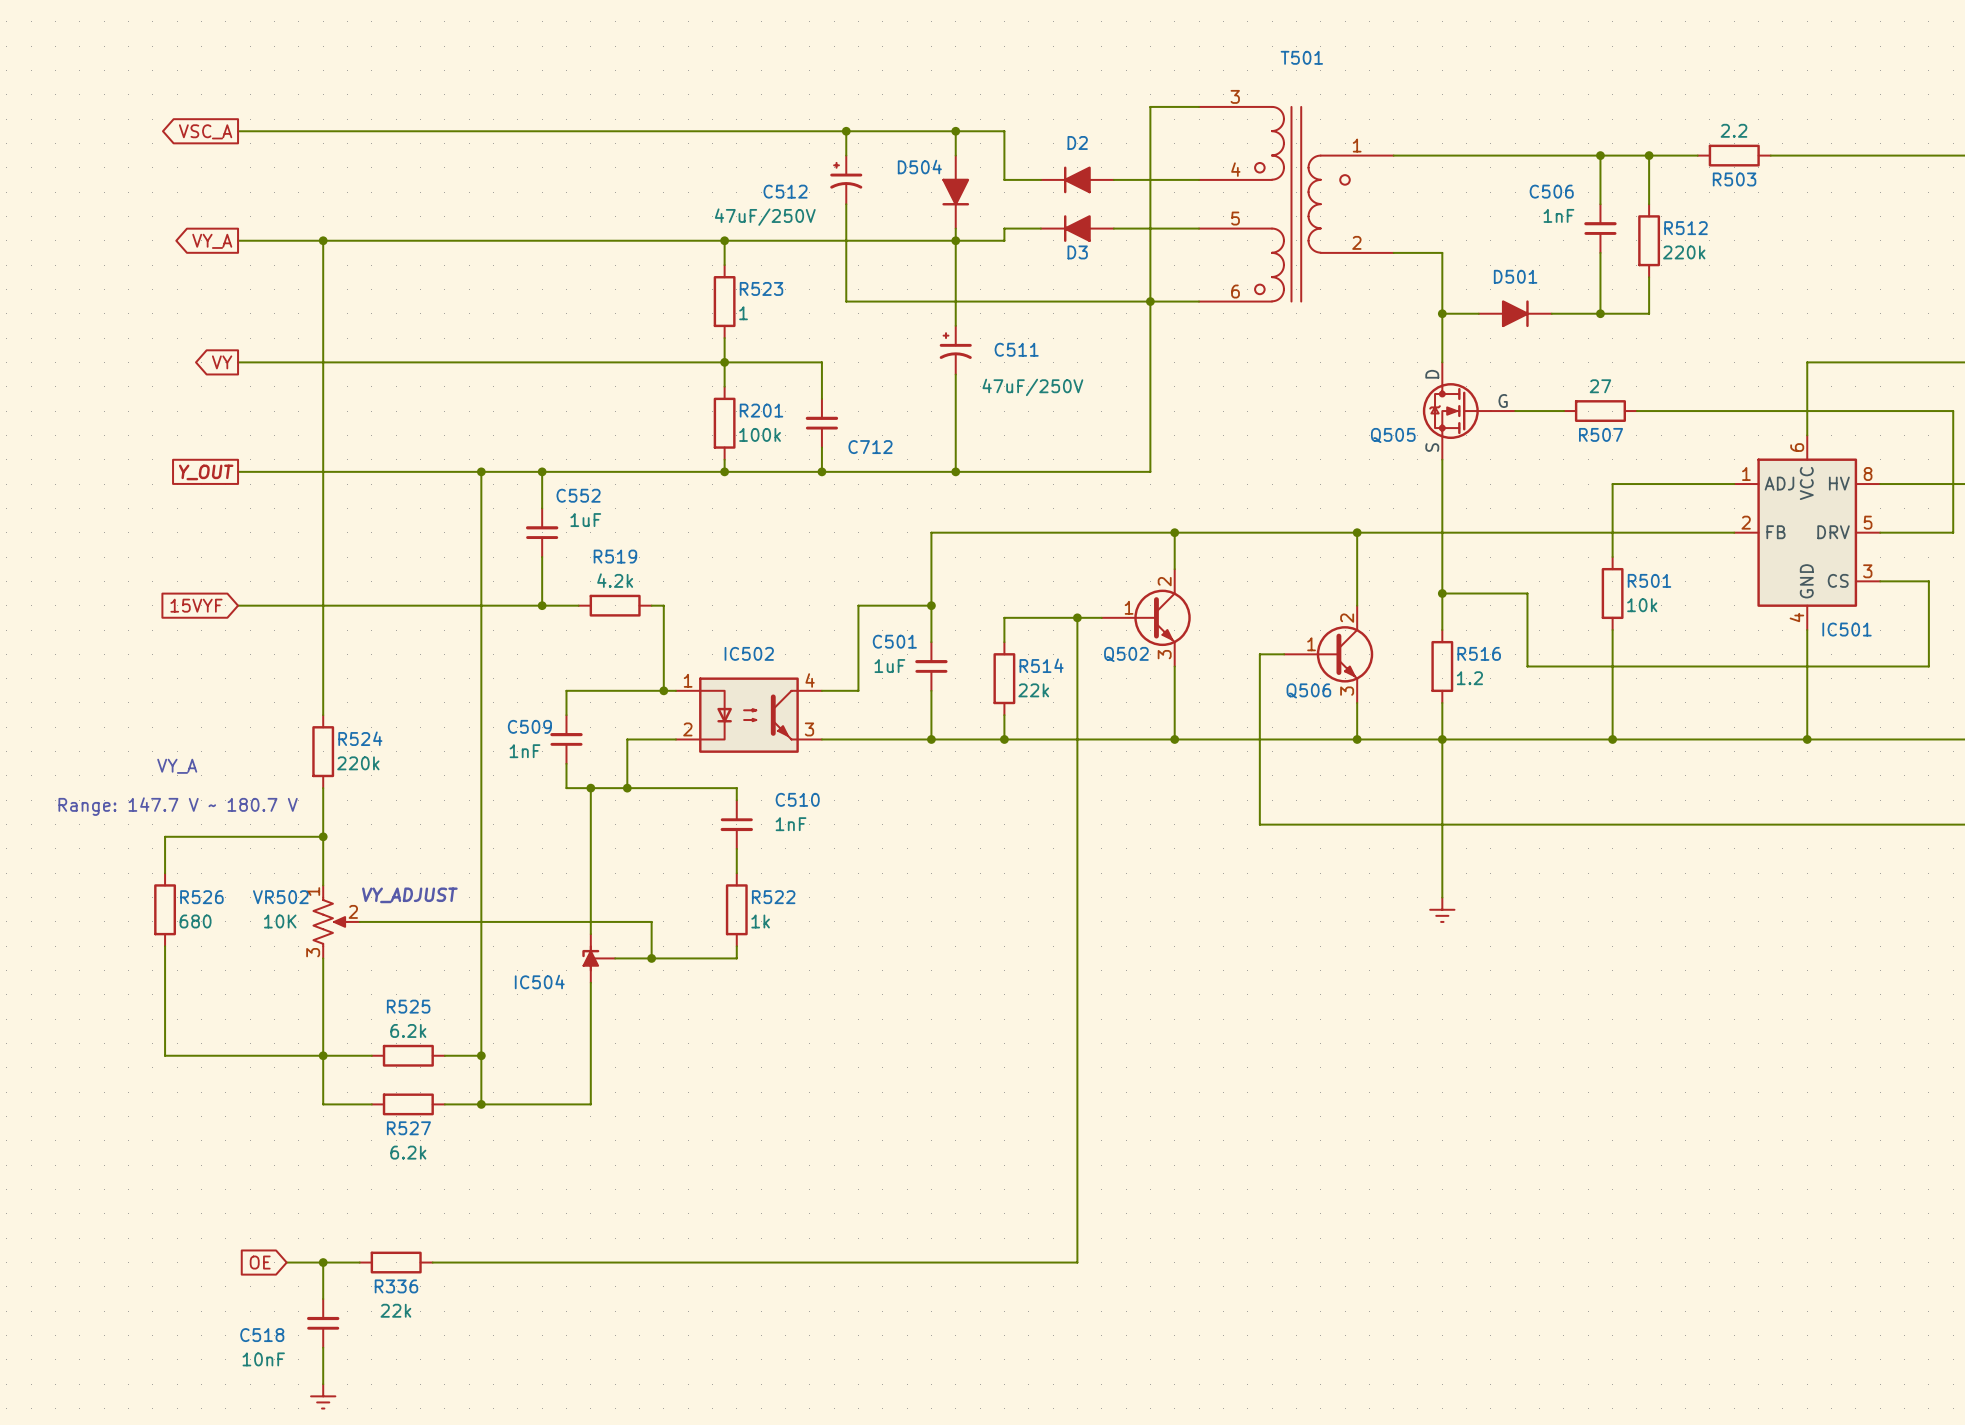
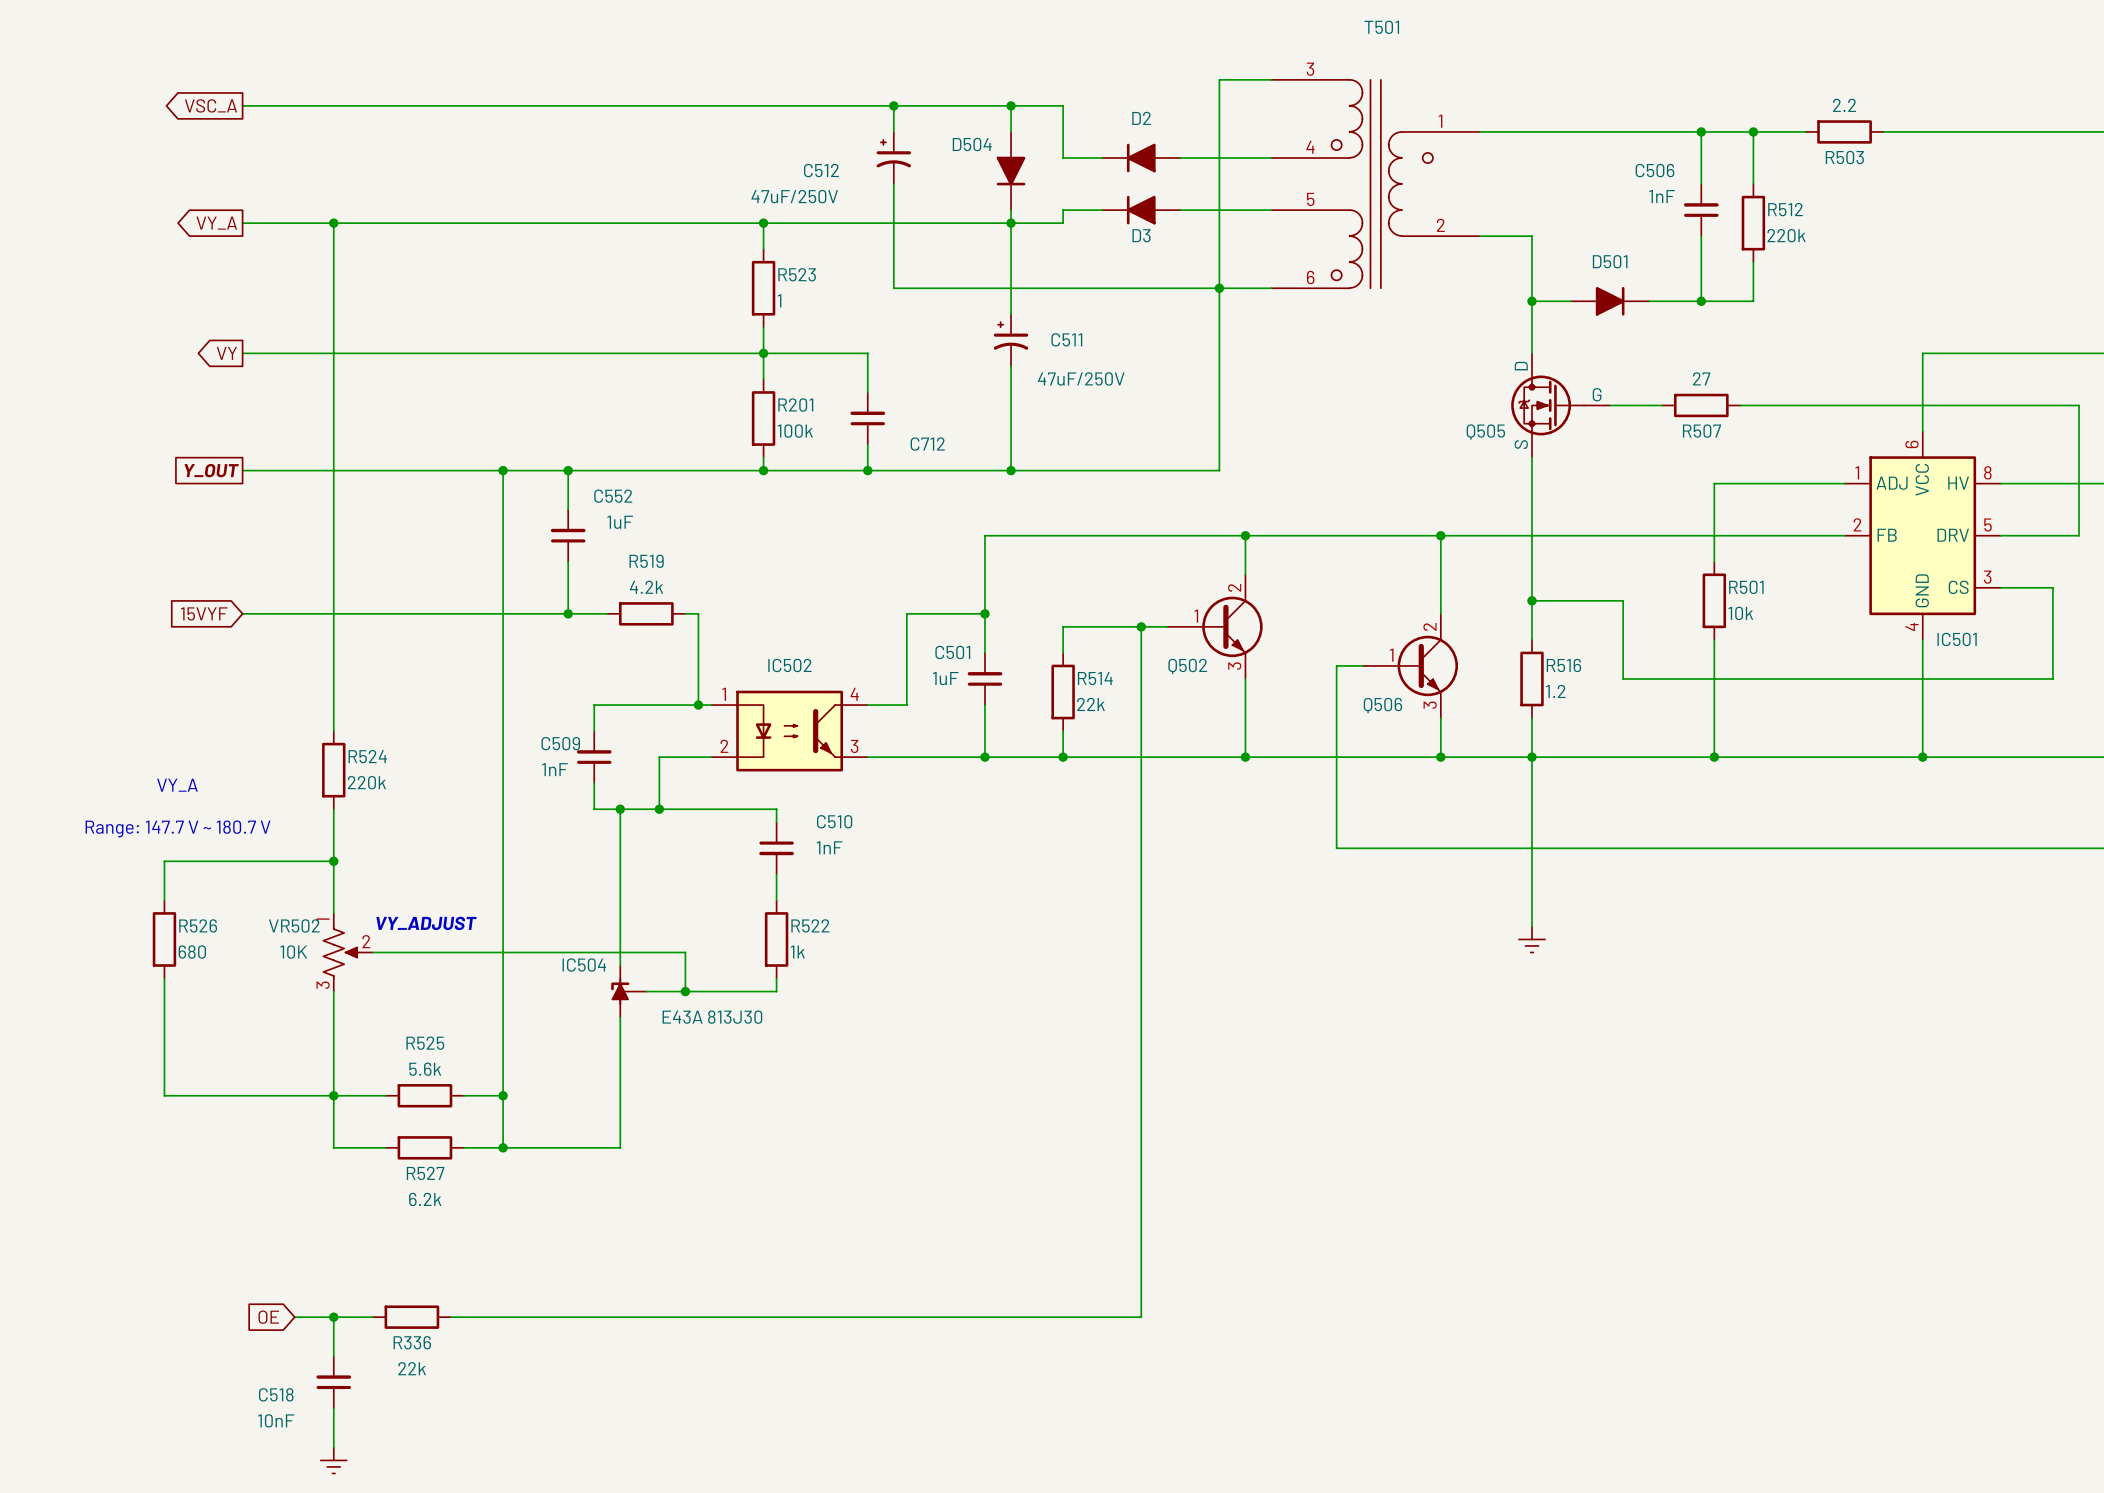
IC504 name position: IC504 (539, 982) -> IC504 (584, 965)
IC504 value: none -> E43A 813J30 (712, 1017)
R525 value: 6.2k (408, 1030) -> 5.6k (425, 1069)

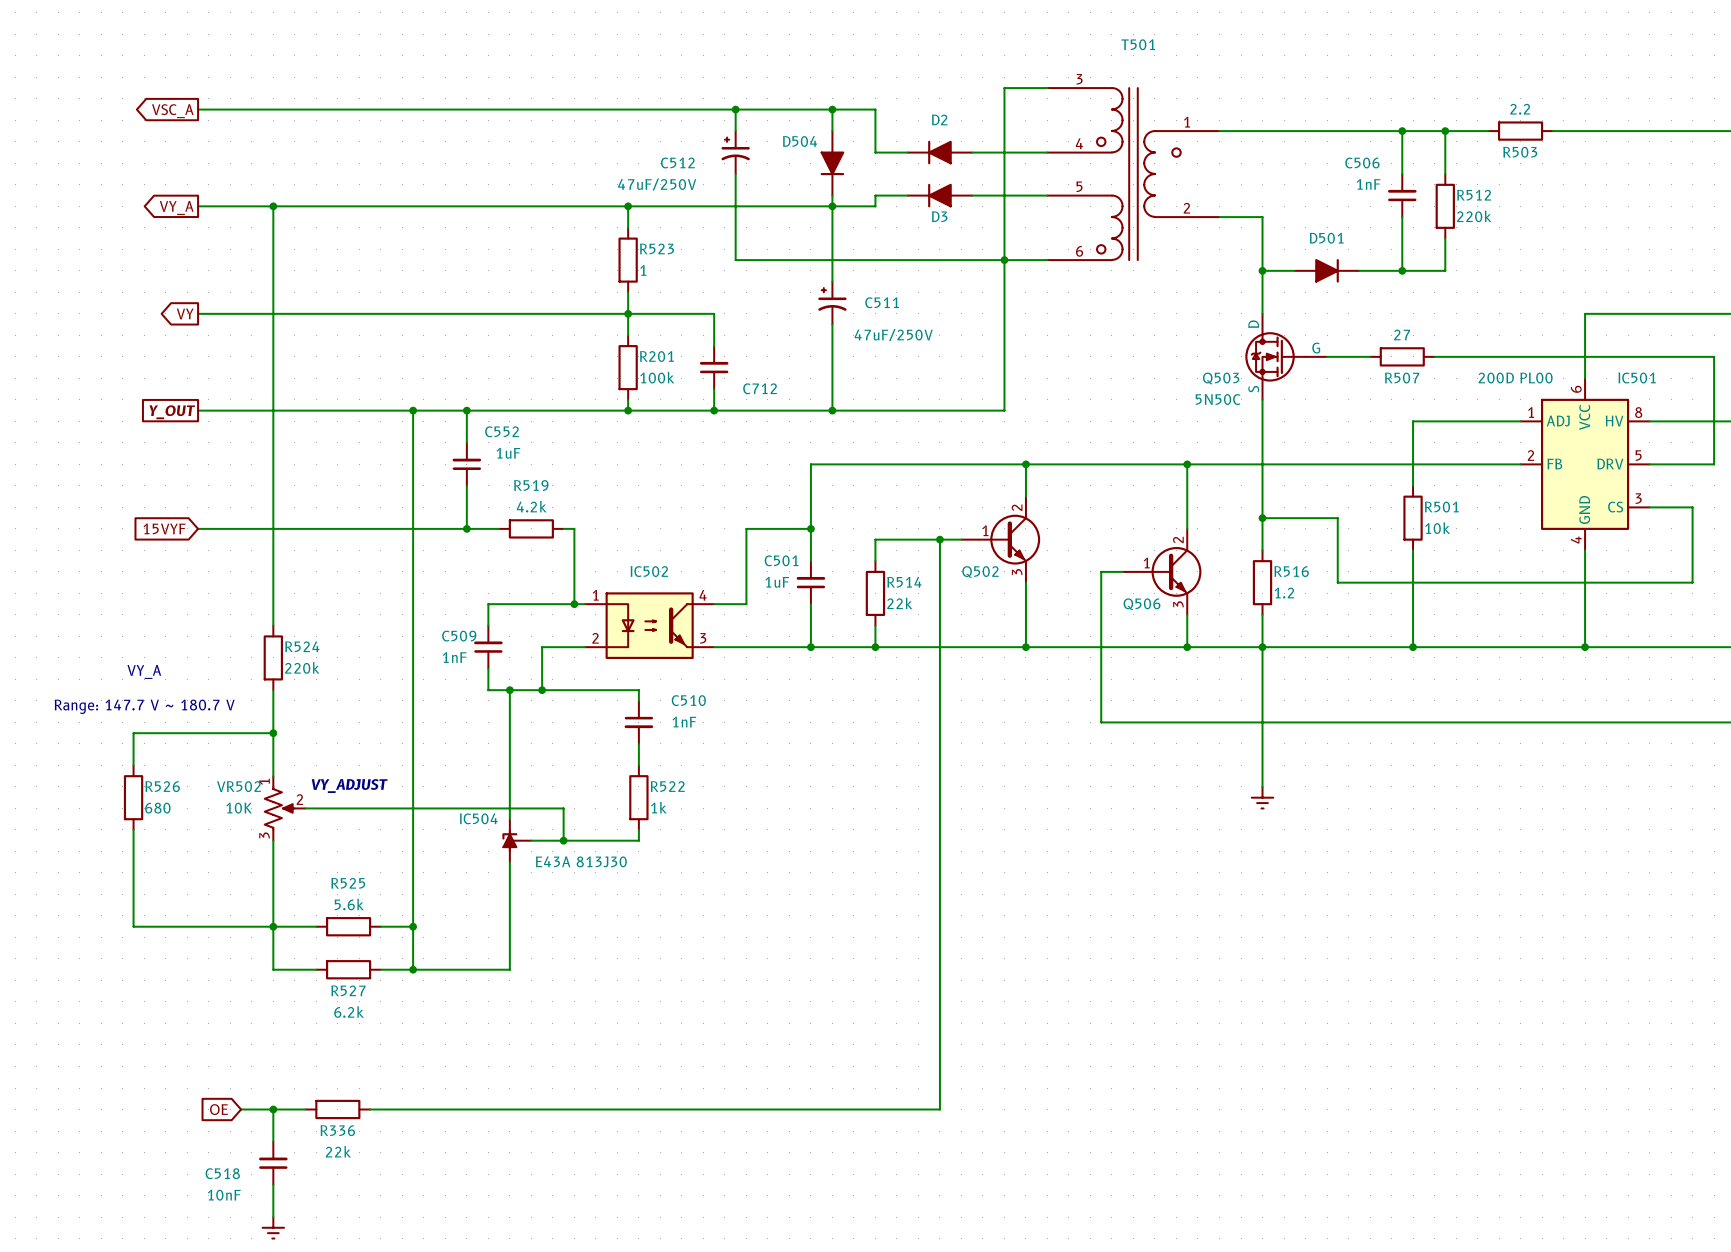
IC501 value: none -> 200D PL00 (1515, 378)
Q505 name: Q505 (1485, 432) -> Q503 (1221, 378)
Q505 value: none -> 5N50C (1218, 399)
IC501 name position: IC501 (1957, 639) -> IC501 (1637, 378)

